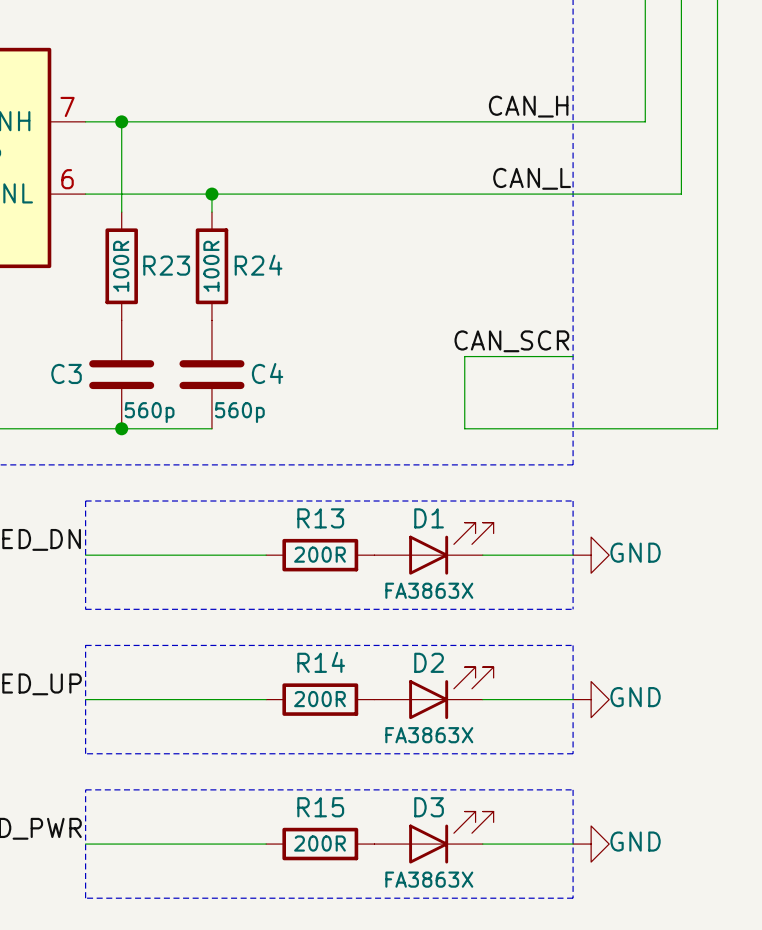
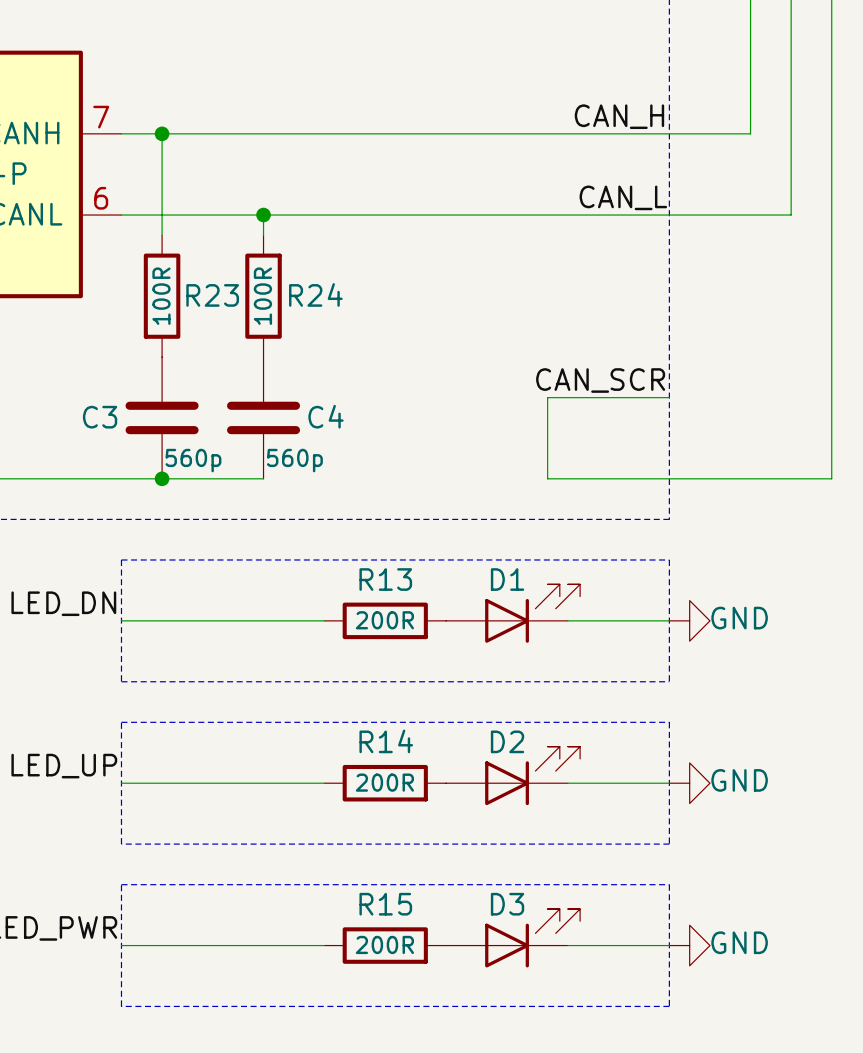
D1 value: FA3863X (429, 590) -> none
D2 value: FA3863X (429, 735) -> none
D3 value: FA3863X (429, 879) -> none

